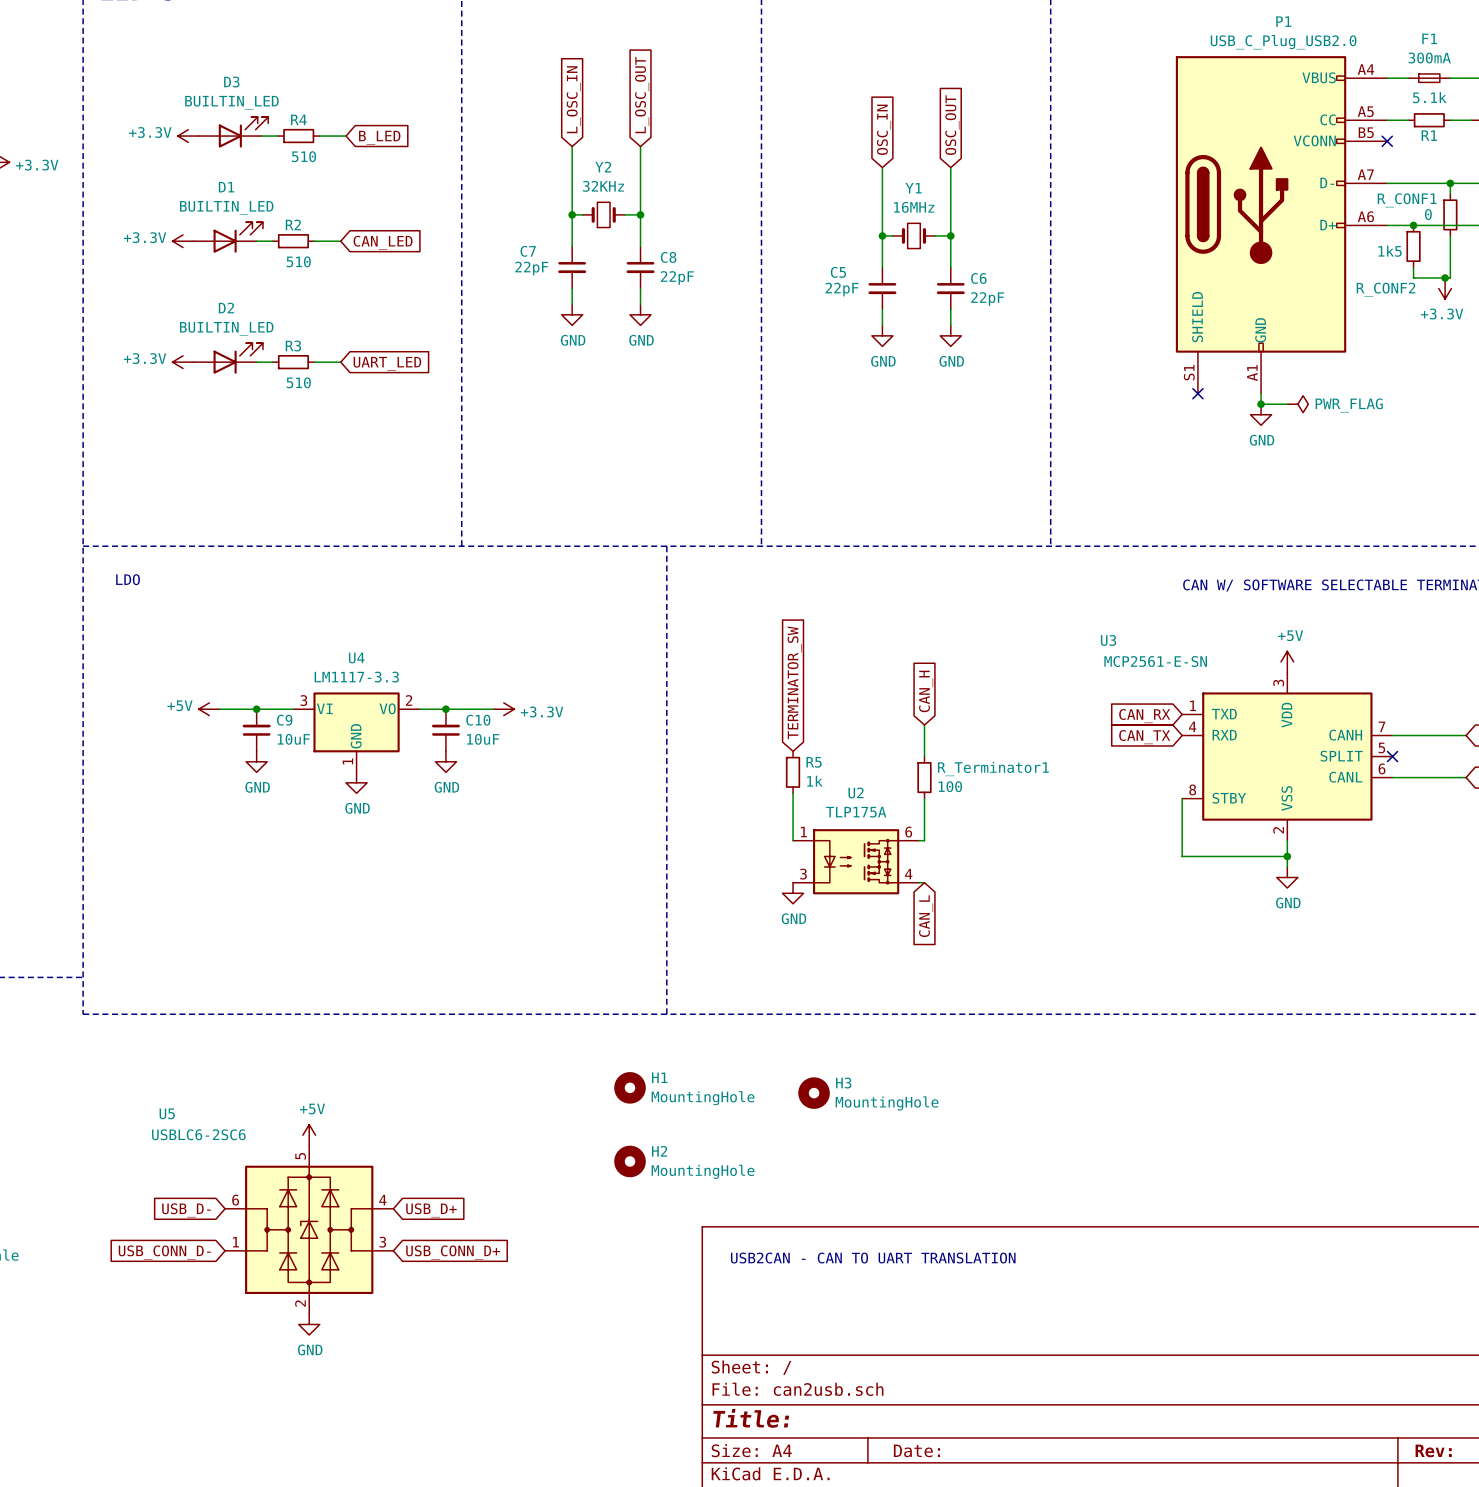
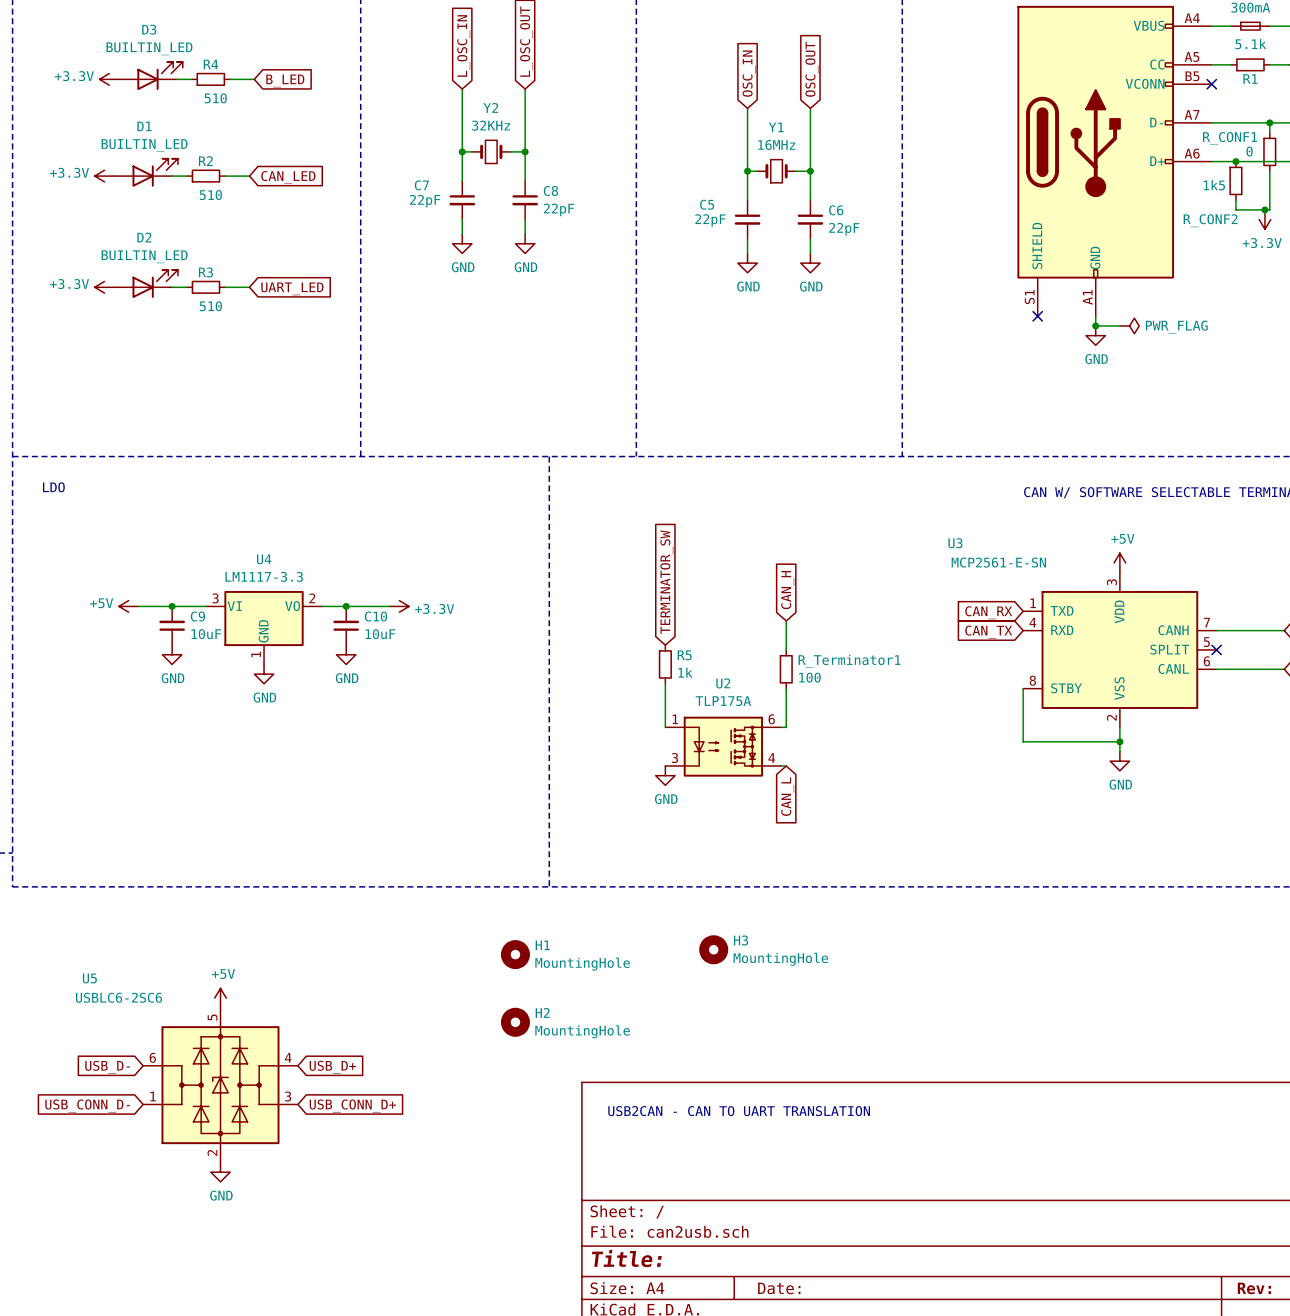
H3 position: (814, 1093) -> (713, 949)

